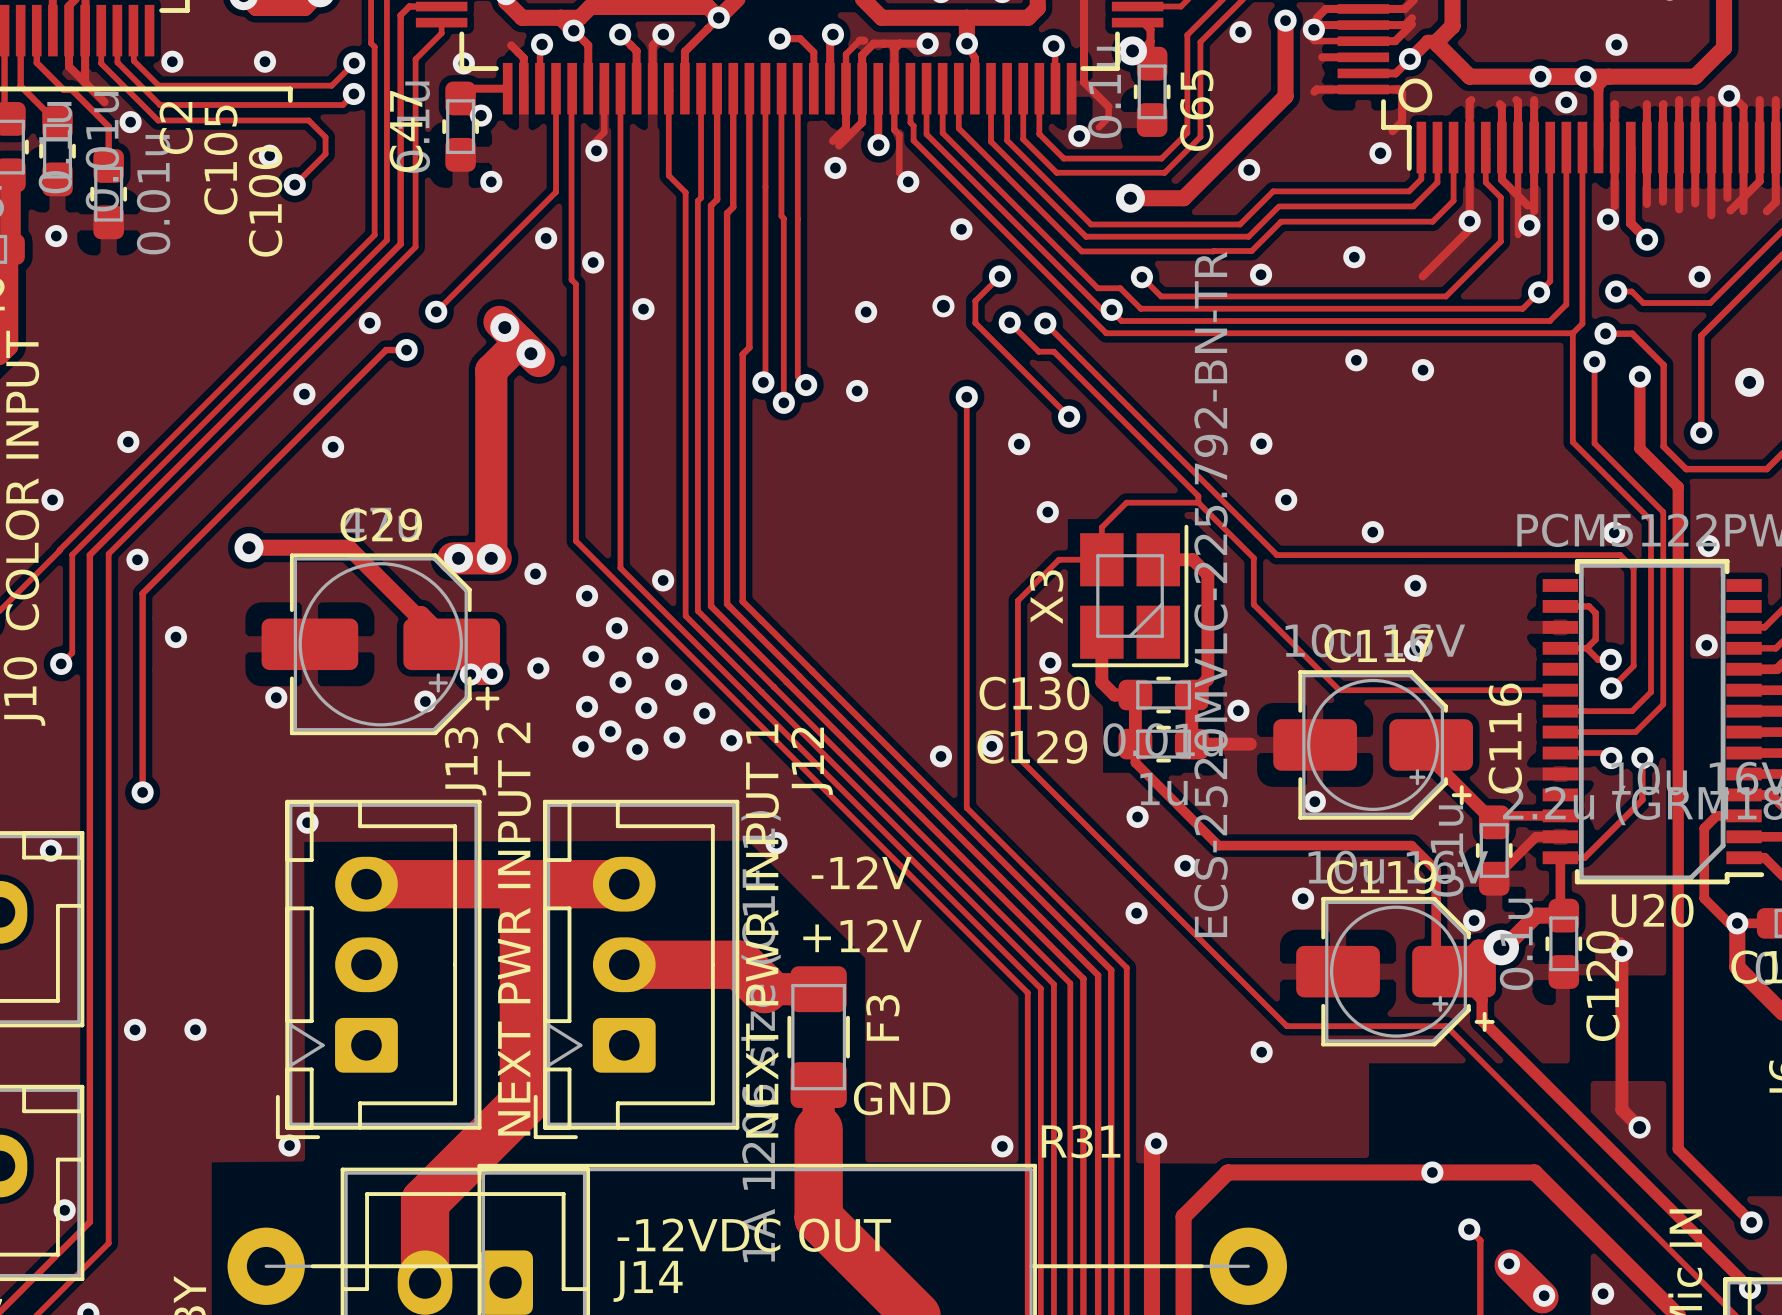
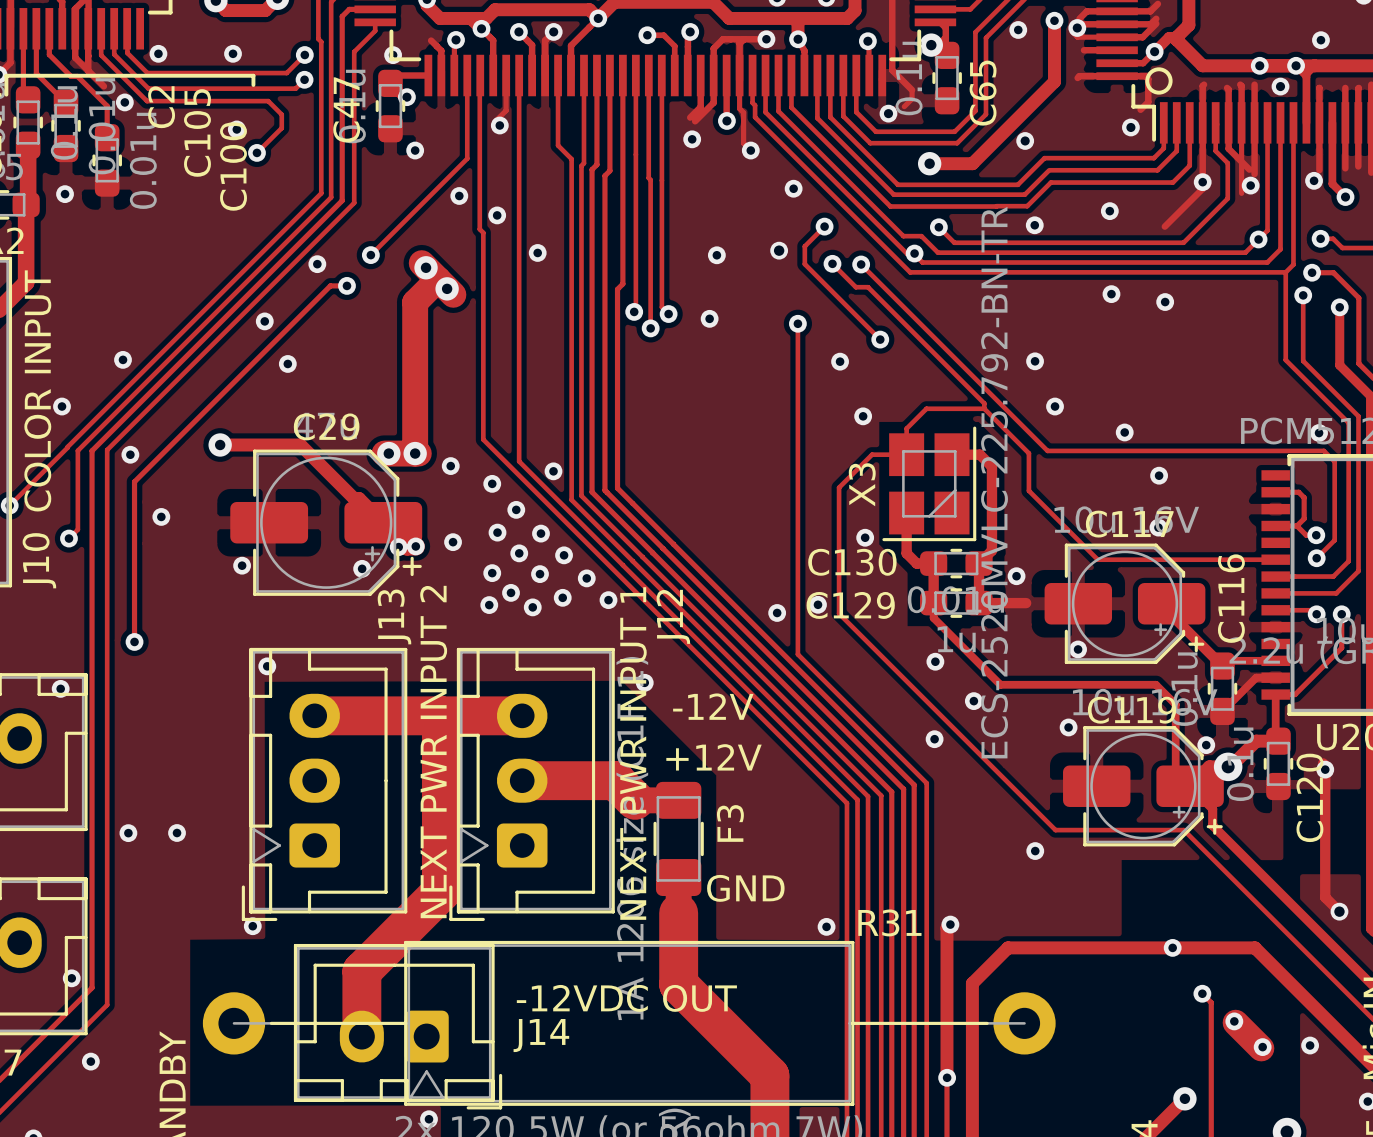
track: (864, 40) (859, 40) (846, 54) (846, 88) -> none

